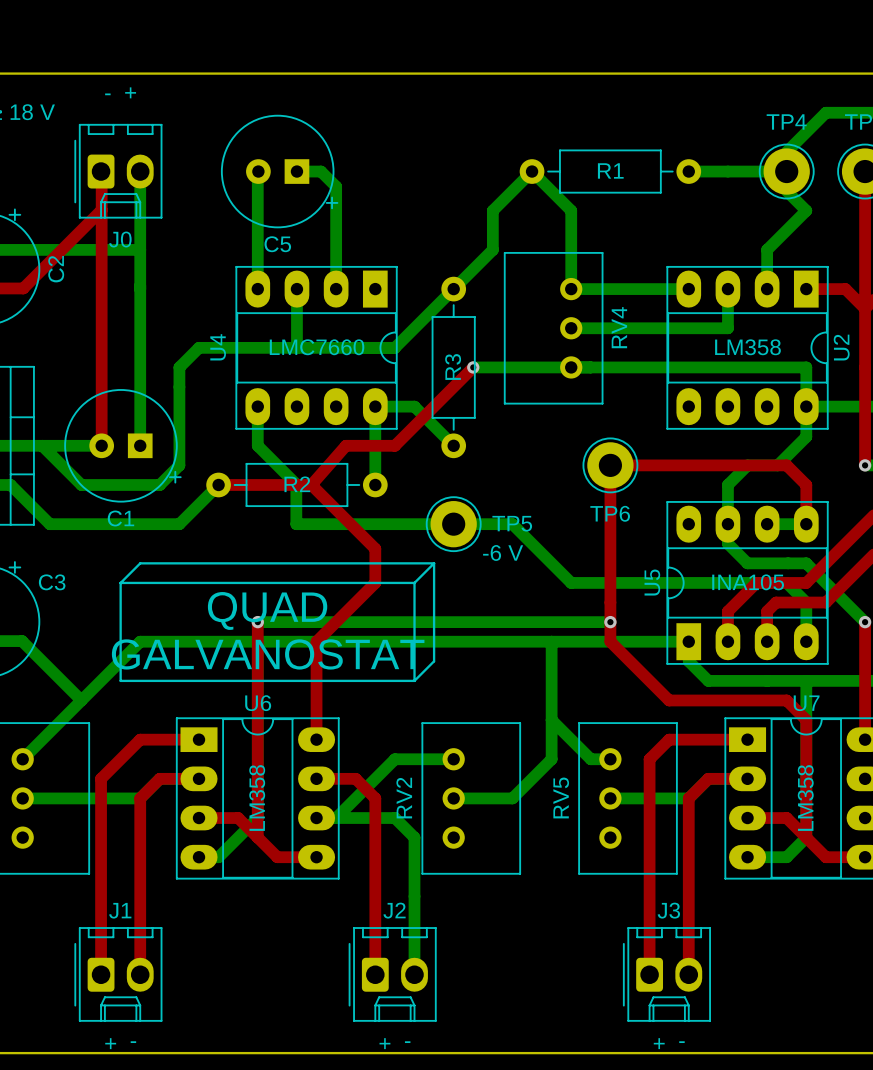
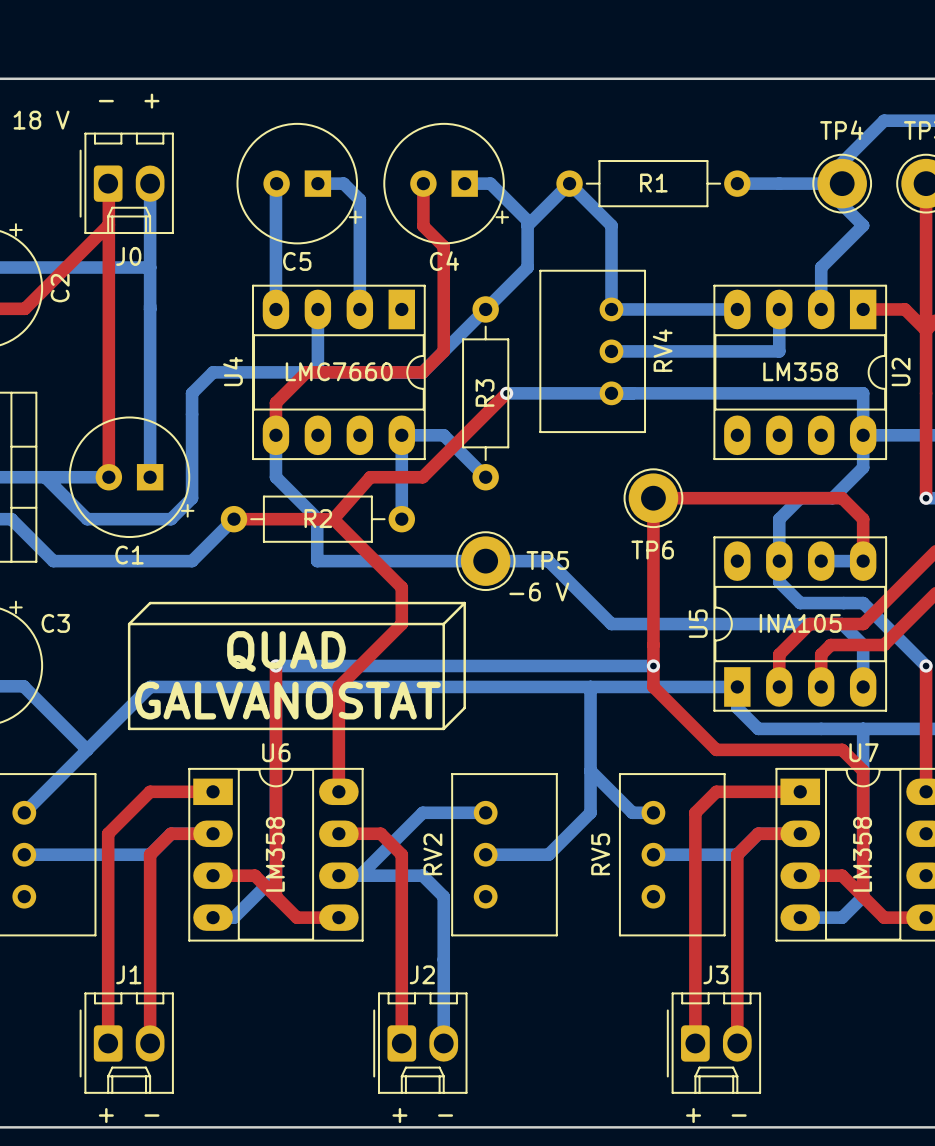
top track: none -> (423, 183) (423, 226) (443, 246) (443, 351) (422, 372) (306, 372) (275, 402) (275, 435)
C4: none -> (446, 183)
bottom track: none -> (464, 183) (490, 183) (527, 220) (527, 225)

